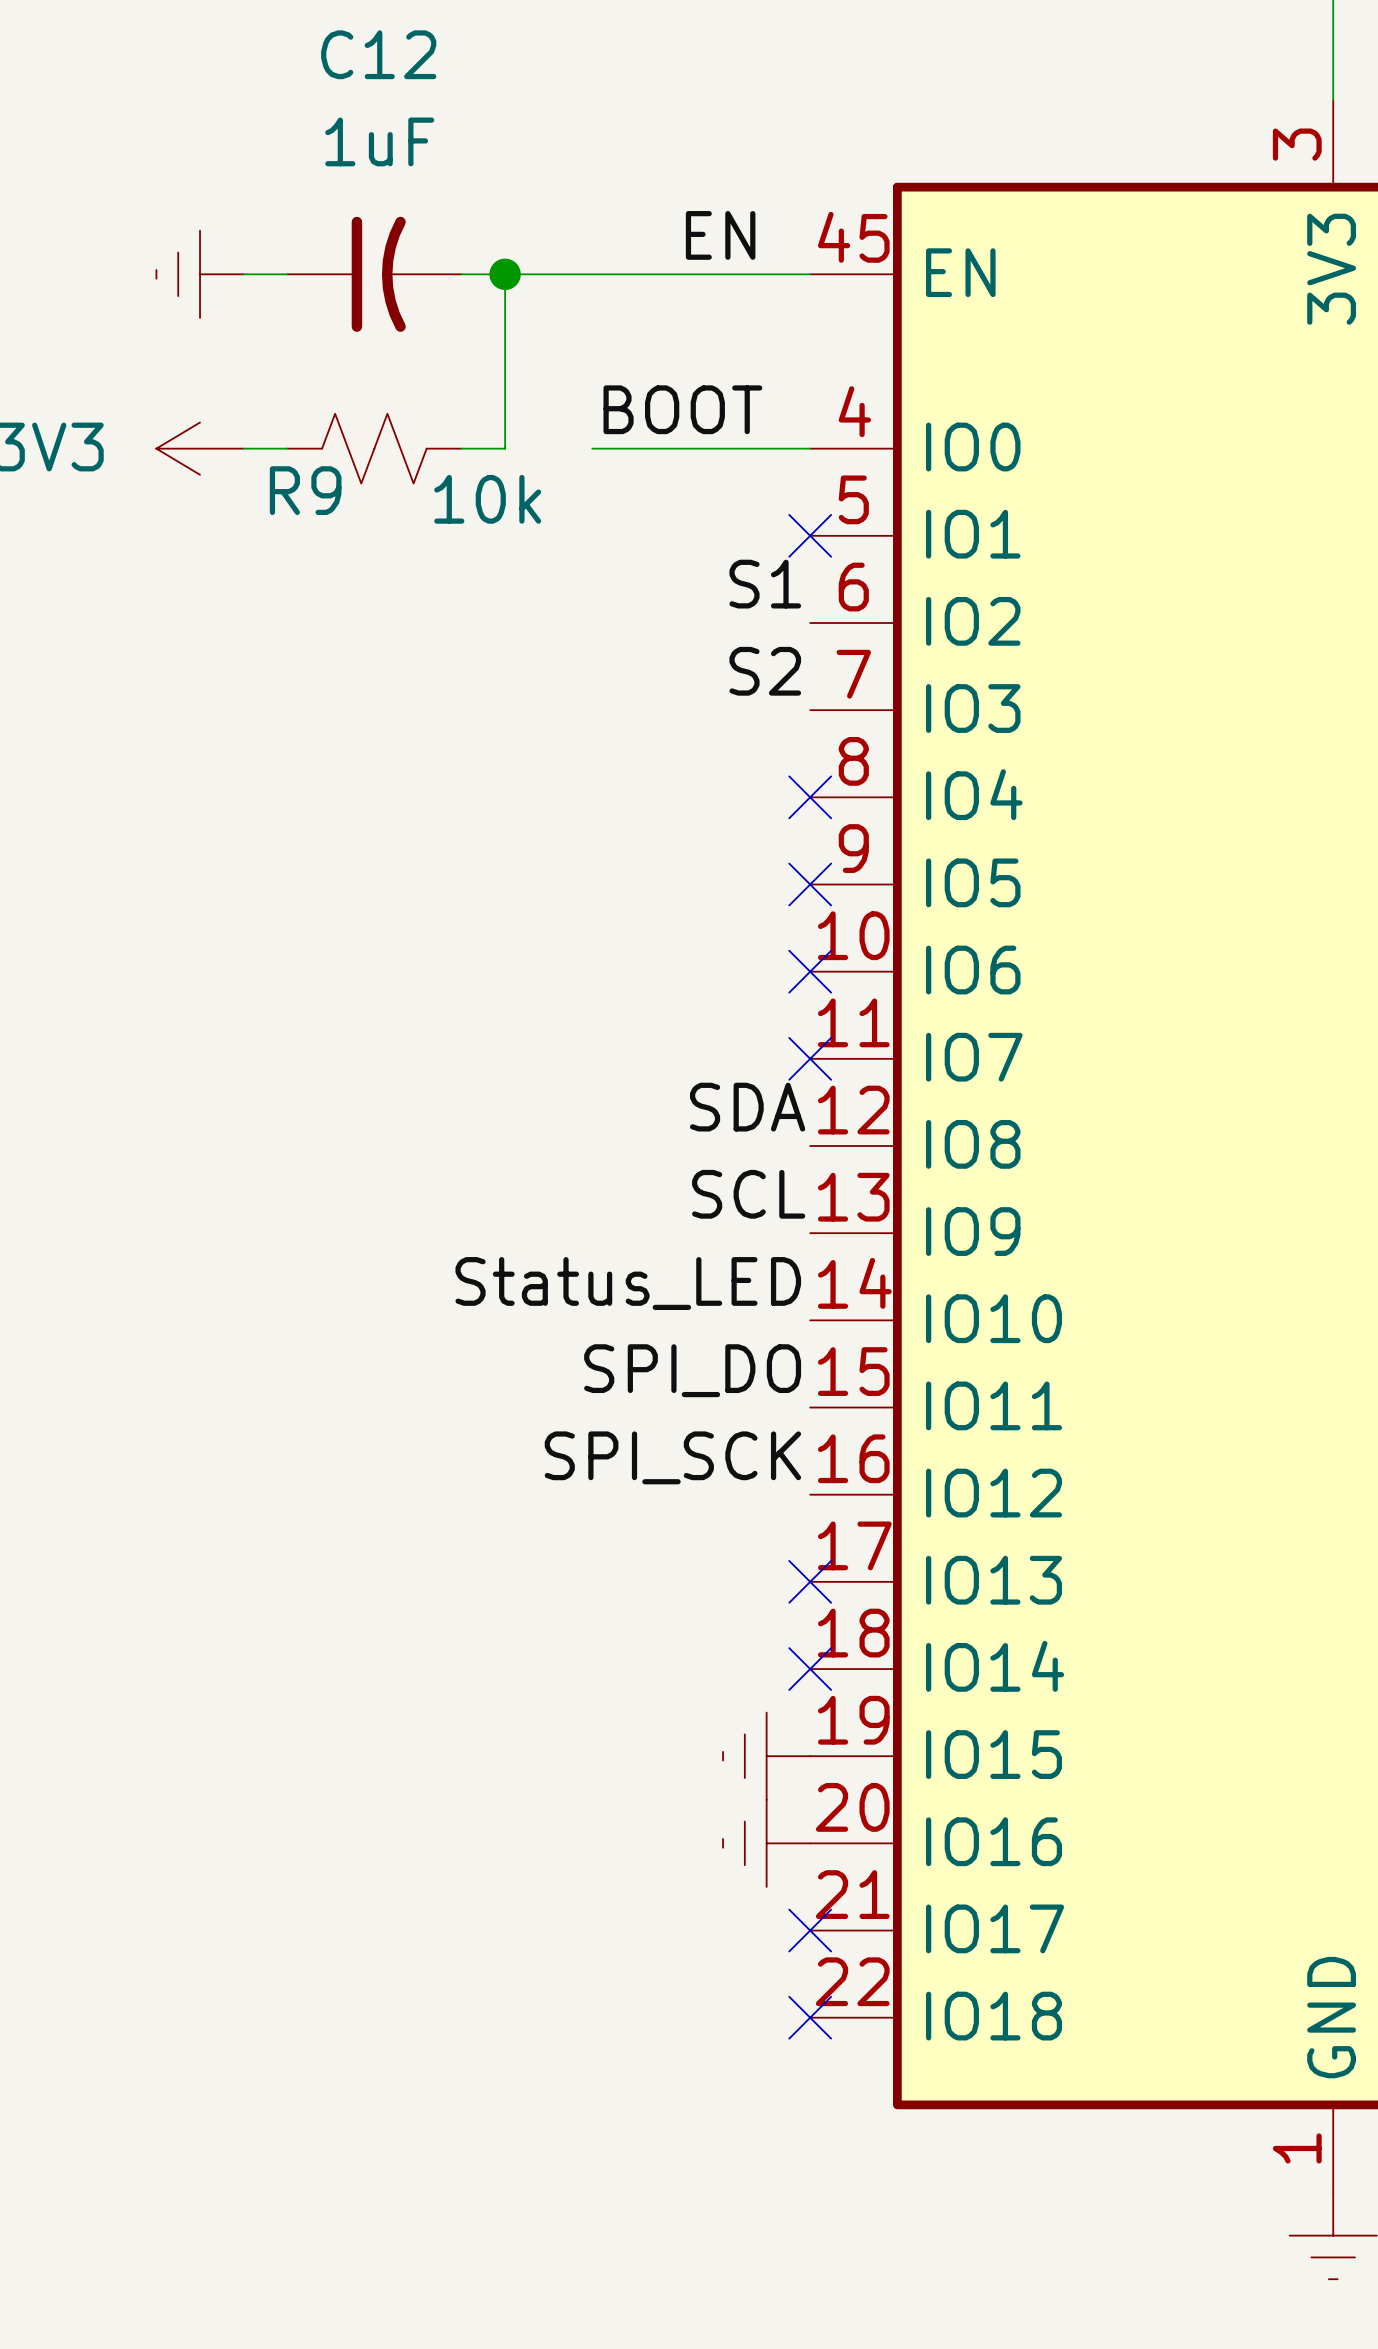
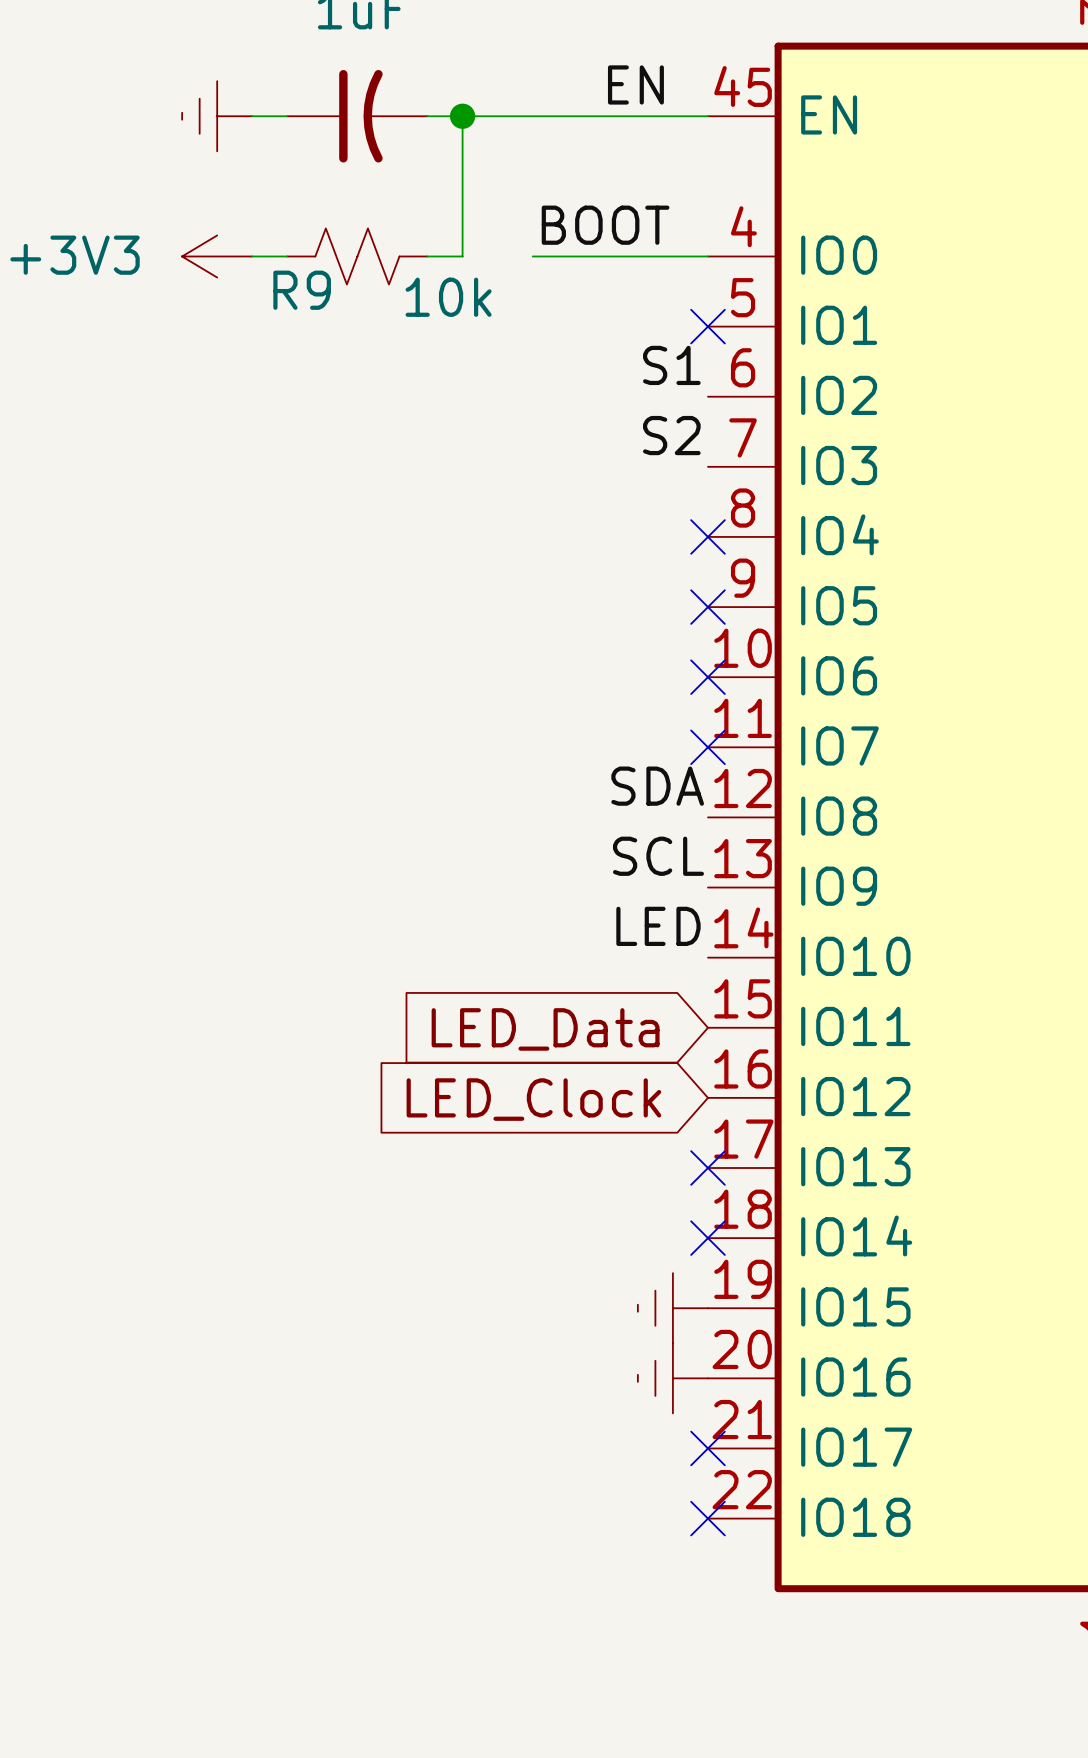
label: Status_LED (628, 1283) -> LED (658, 926)
label: SPI_DO (692, 1370) -> none
global label: none -> LED_Data (545, 1029)
label: SPI_SCK (672, 1457) -> none
global label: none -> LED_Clock (533, 1099)

